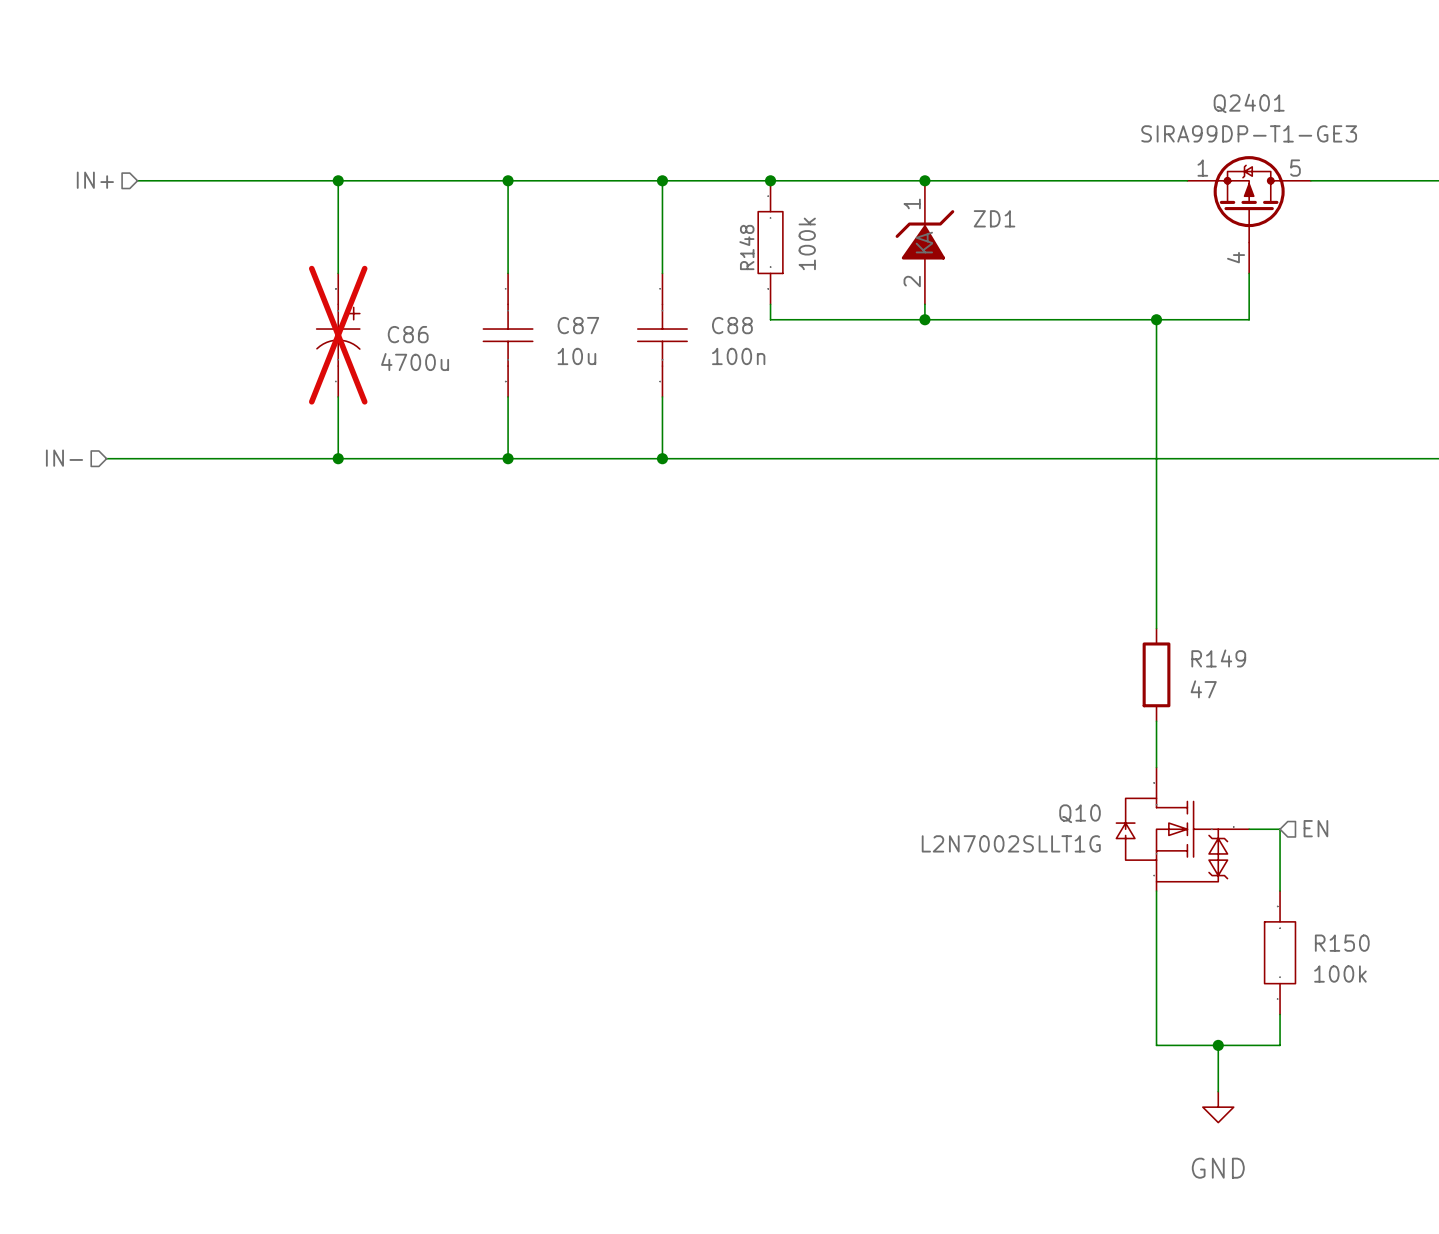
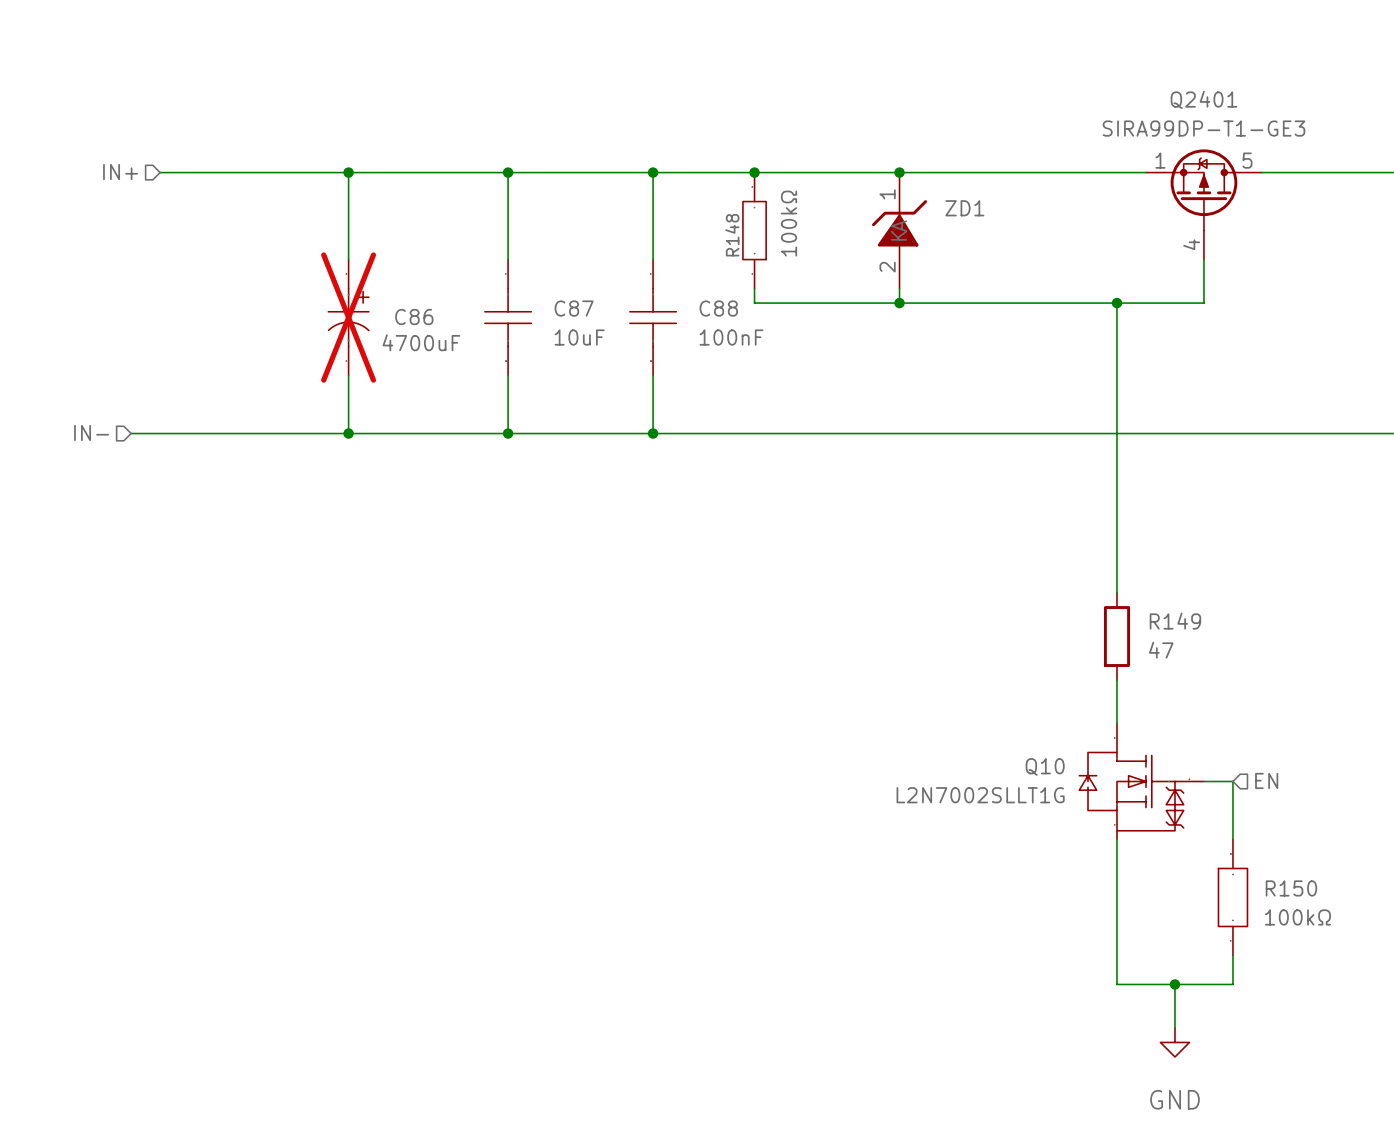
R148 value: 100k (807, 243) -> 100kΩ (789, 223)
C87 value: 10u (576, 356) -> 10uF (579, 337)
C88 value: 100n (738, 356) -> 100nF (731, 337)
C86 value: 4700u (415, 362) -> 4700uF (421, 342)
R150 value: 100k (1340, 974) -> 100kΩ (1297, 917)

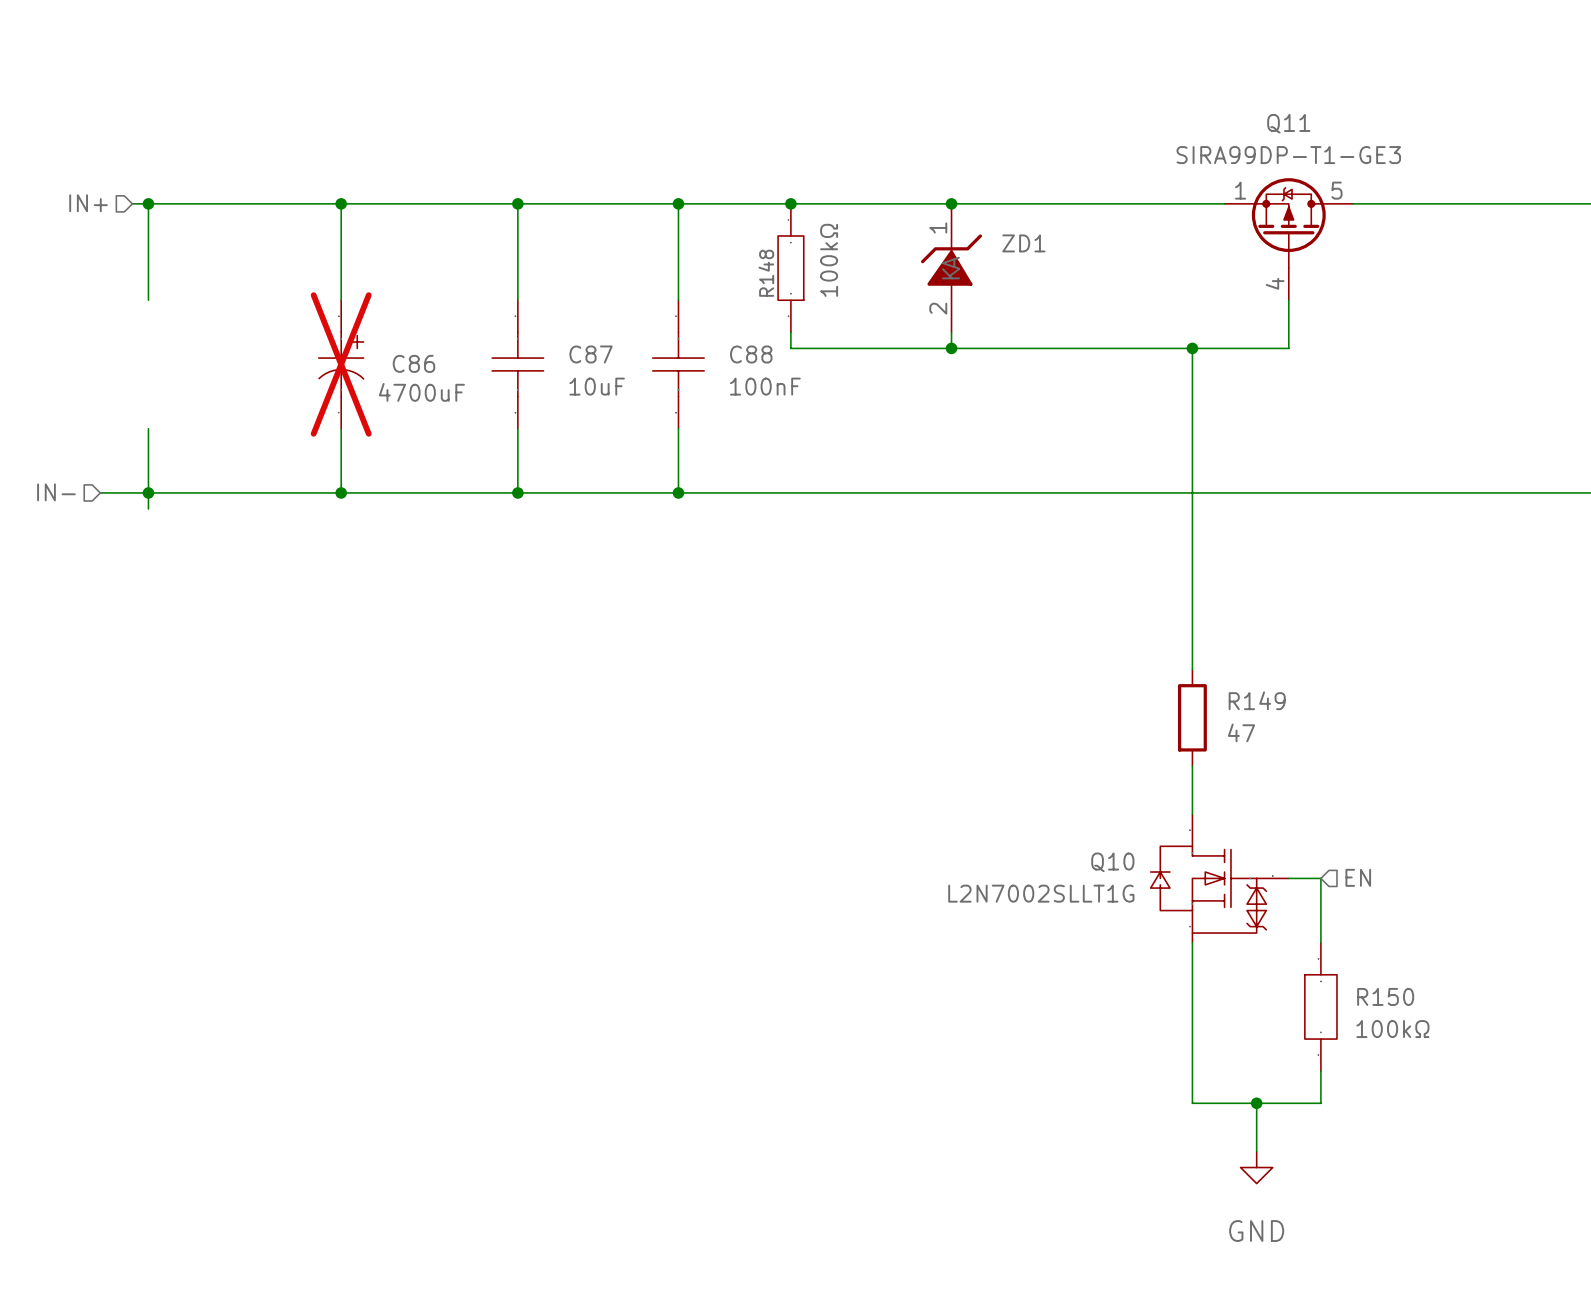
Q2401 name: Q2401 (1203, 99) -> Q11 (1288, 123)
wire: none -> (148, 203) (148, 300)
junction: none -> (148, 203)
wire: none -> (148, 428) (148, 509)
junction: none -> (148, 492)

